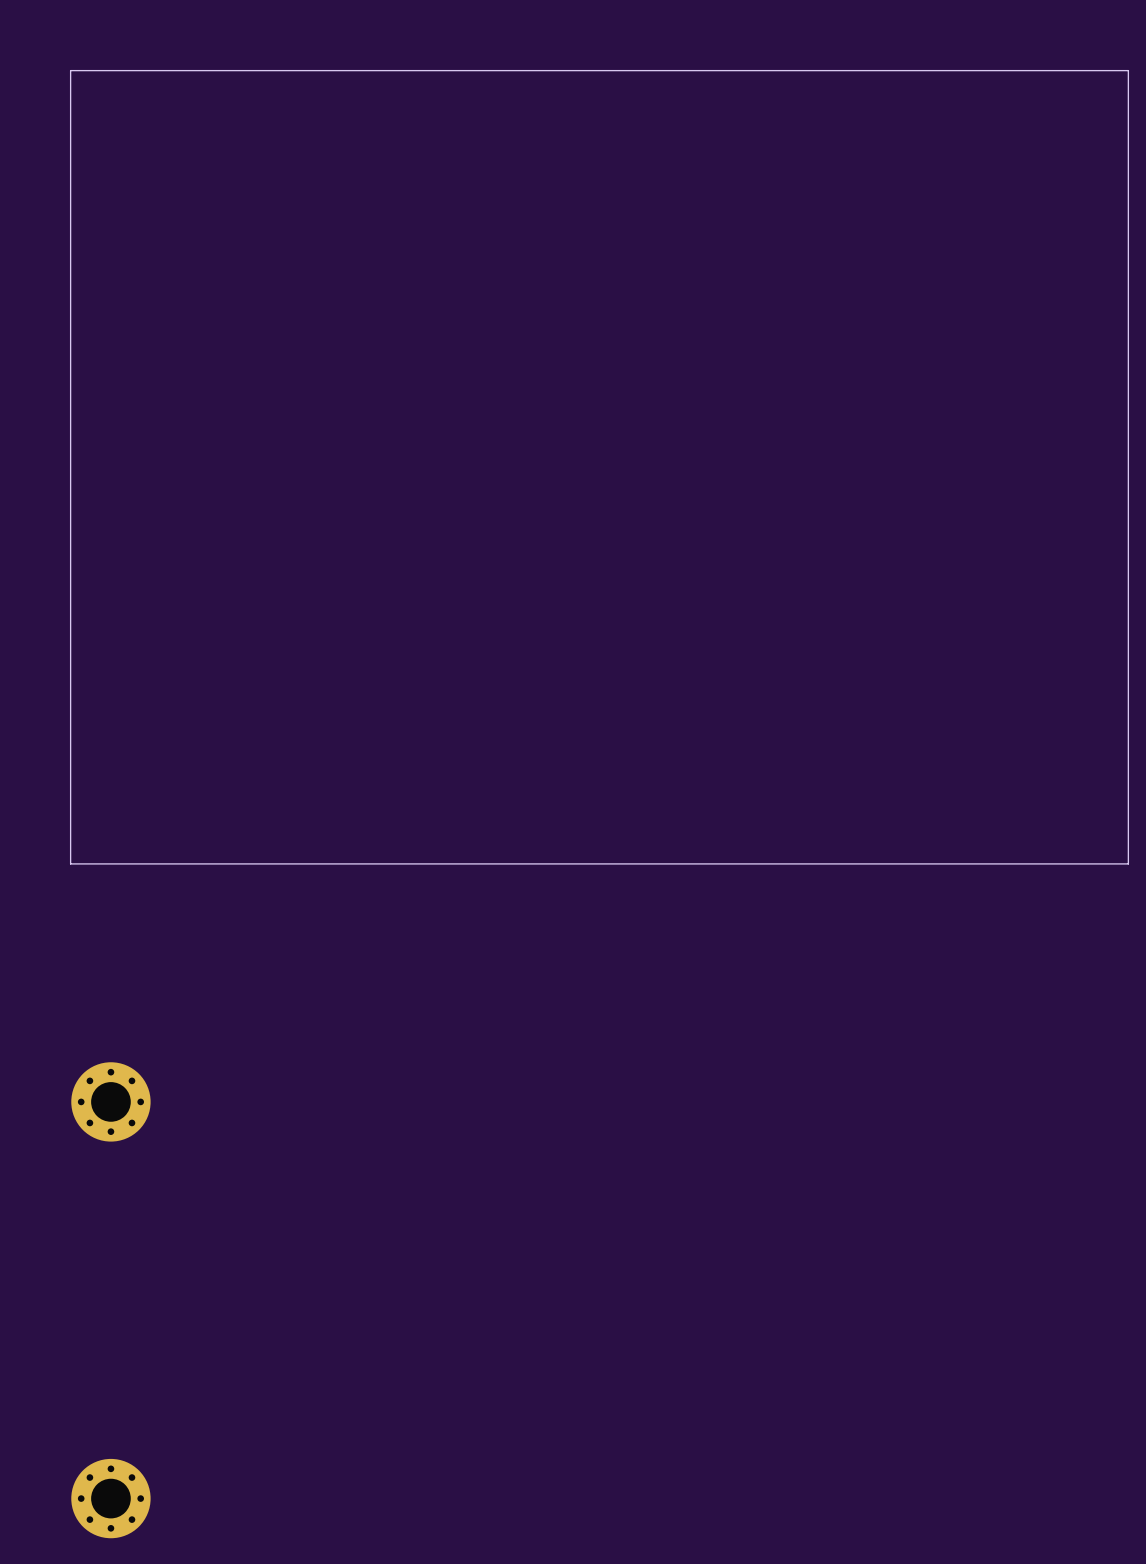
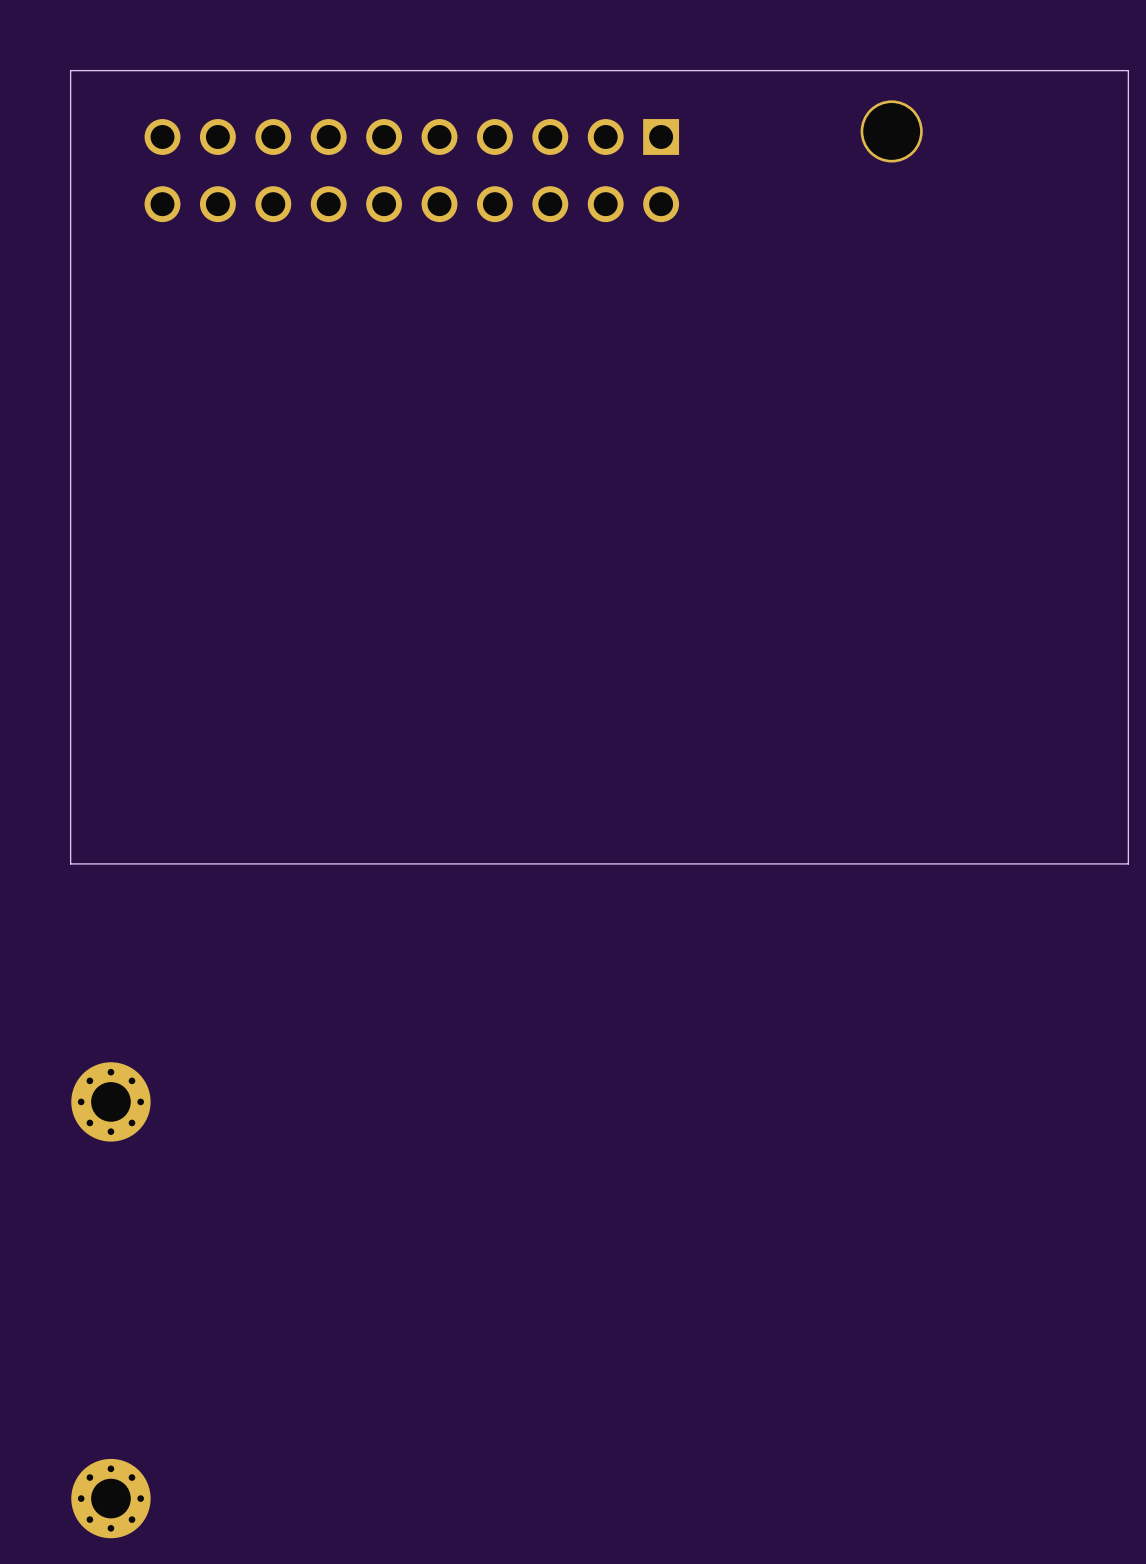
part: none -> (891, 131)
part: none -> (411, 170)

